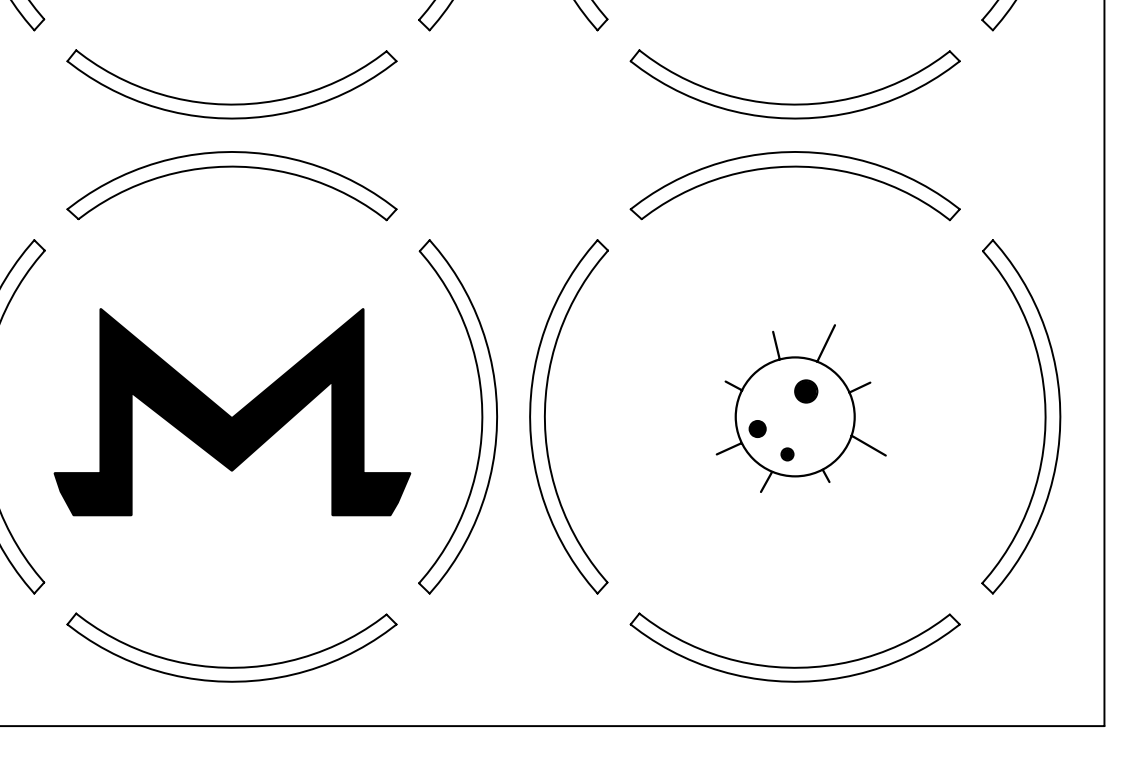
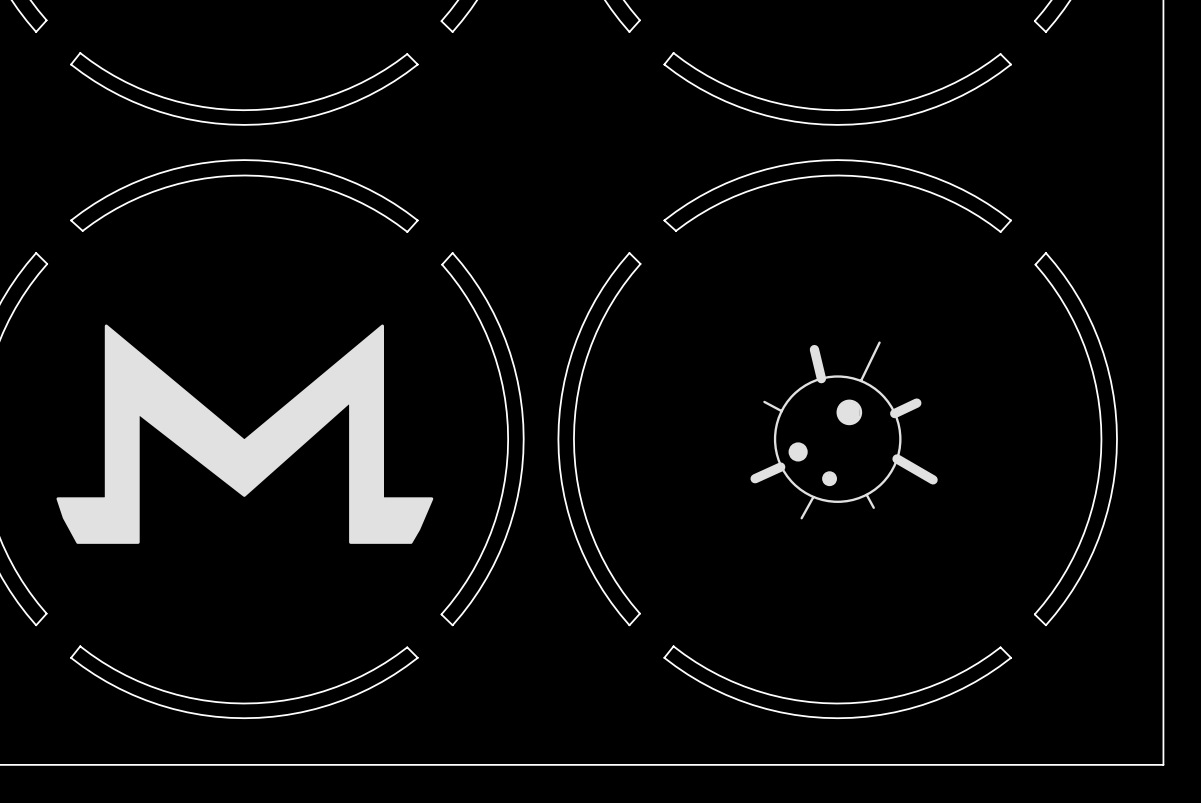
line width: thin (773, 331) (779, 359) -> thick (814, 349) (821, 378)
line width: thin (870, 382) (849, 392) -> thick (916, 403) (894, 413)
line width: thin (851, 435) (885, 455) -> thick (897, 458) (933, 479)
line width: thin (741, 443) (716, 454) -> thick (780, 467) (755, 478)

